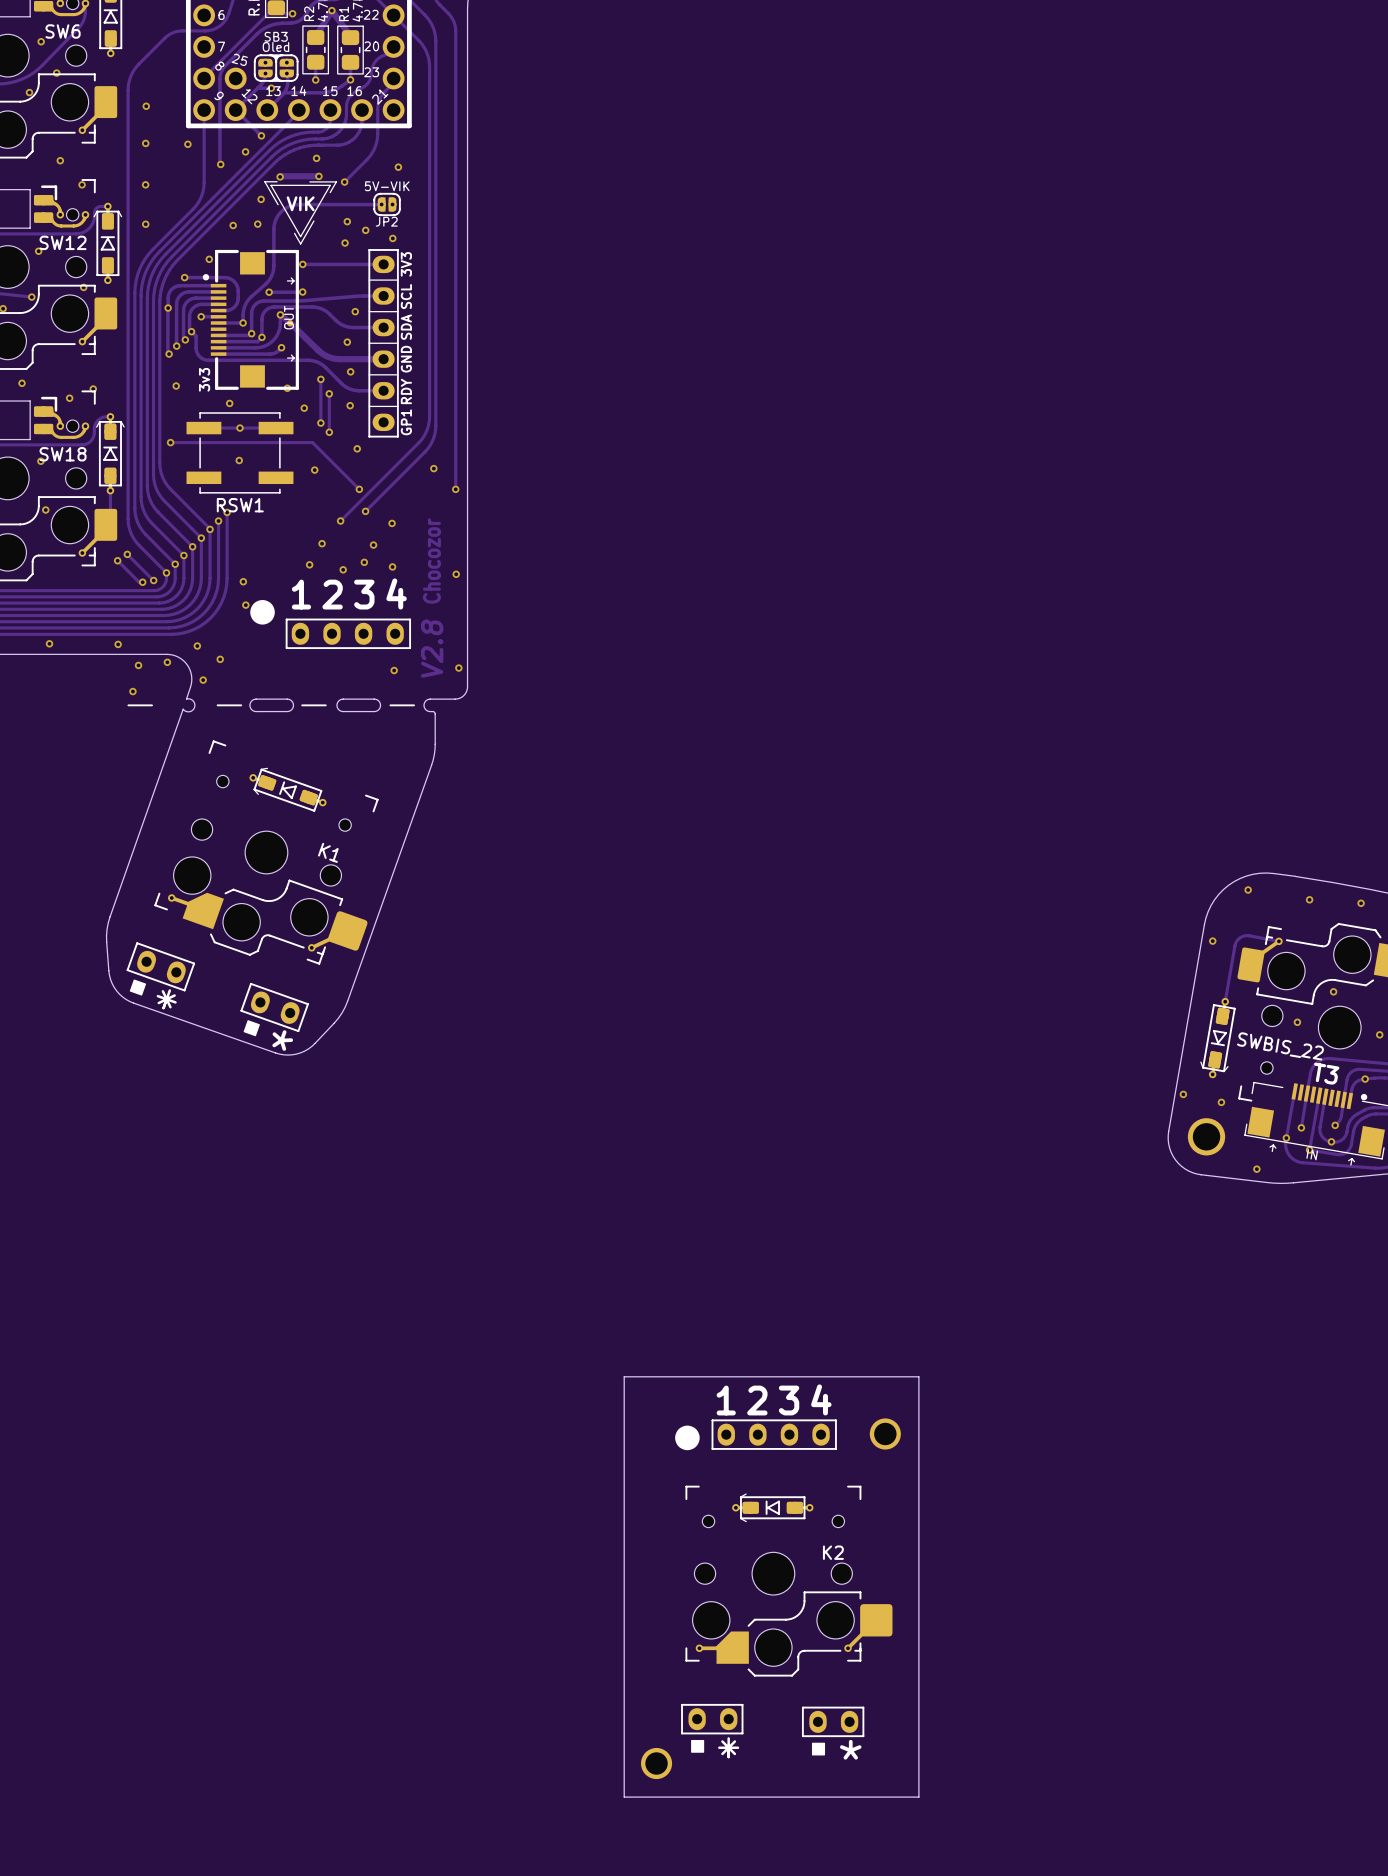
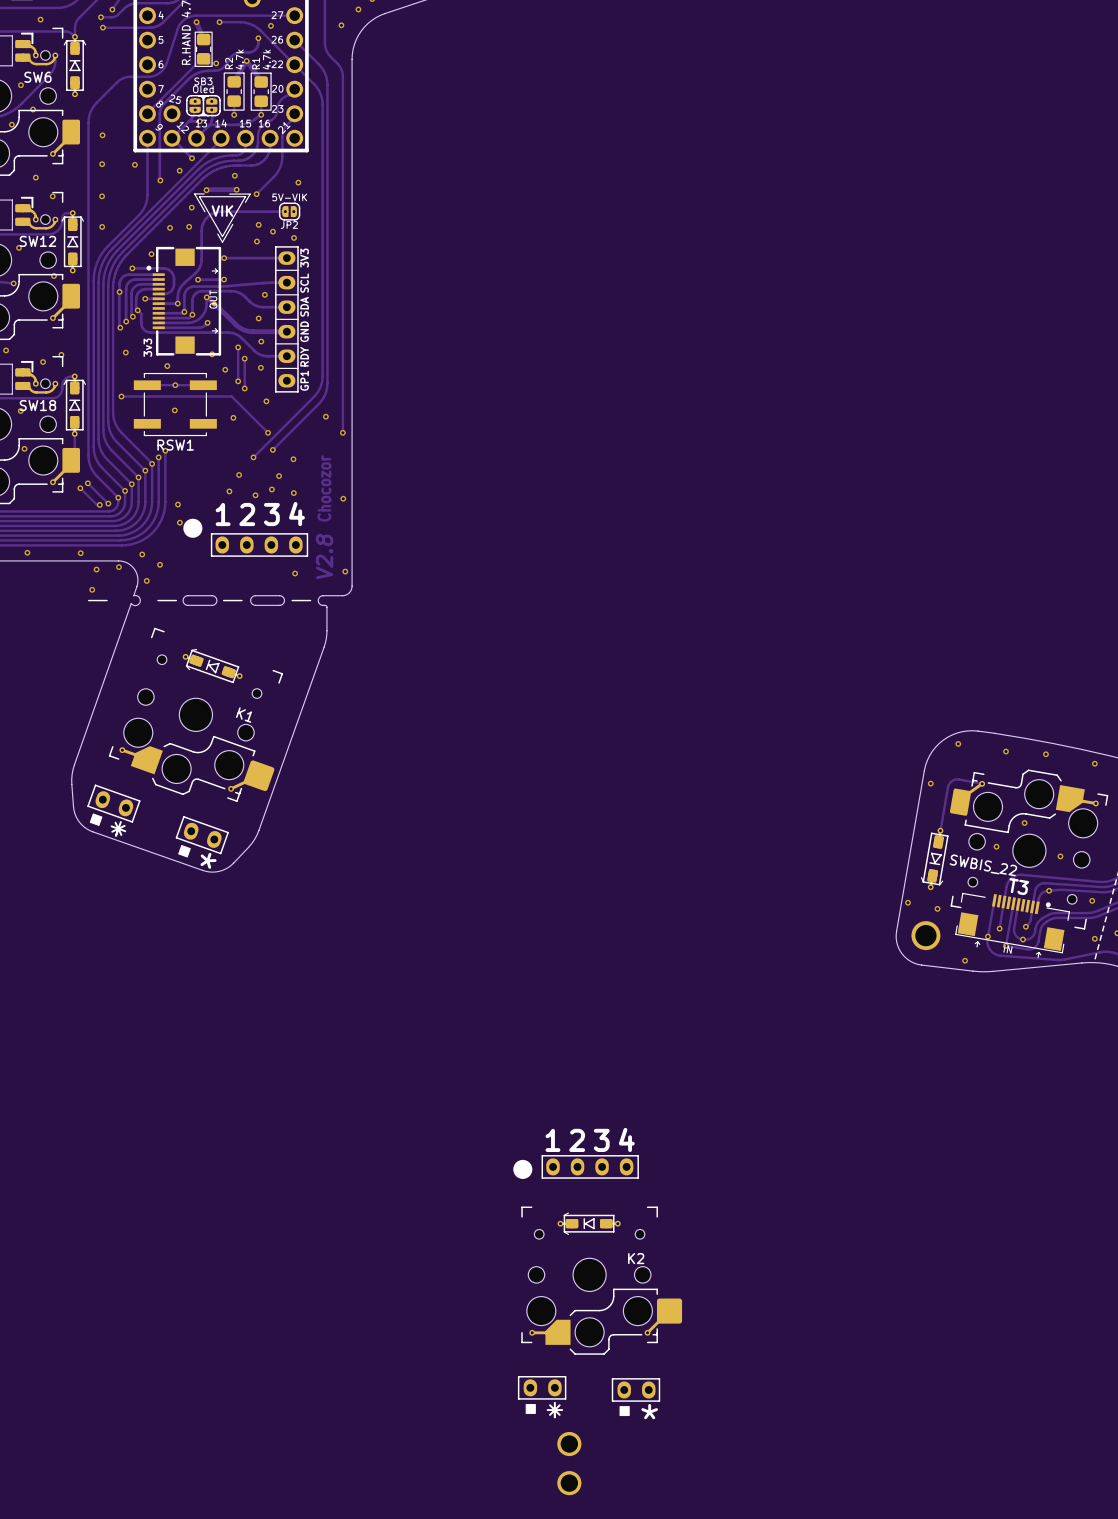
board edge: (624, 1376) (918, 1376) (918, 1797) (624, 1797) (624, 1376) -> none
part: (885, 1433) -> none
part: (656, 1763) -> none
part: none -> (569, 1444)
part: none -> (569, 1483)

